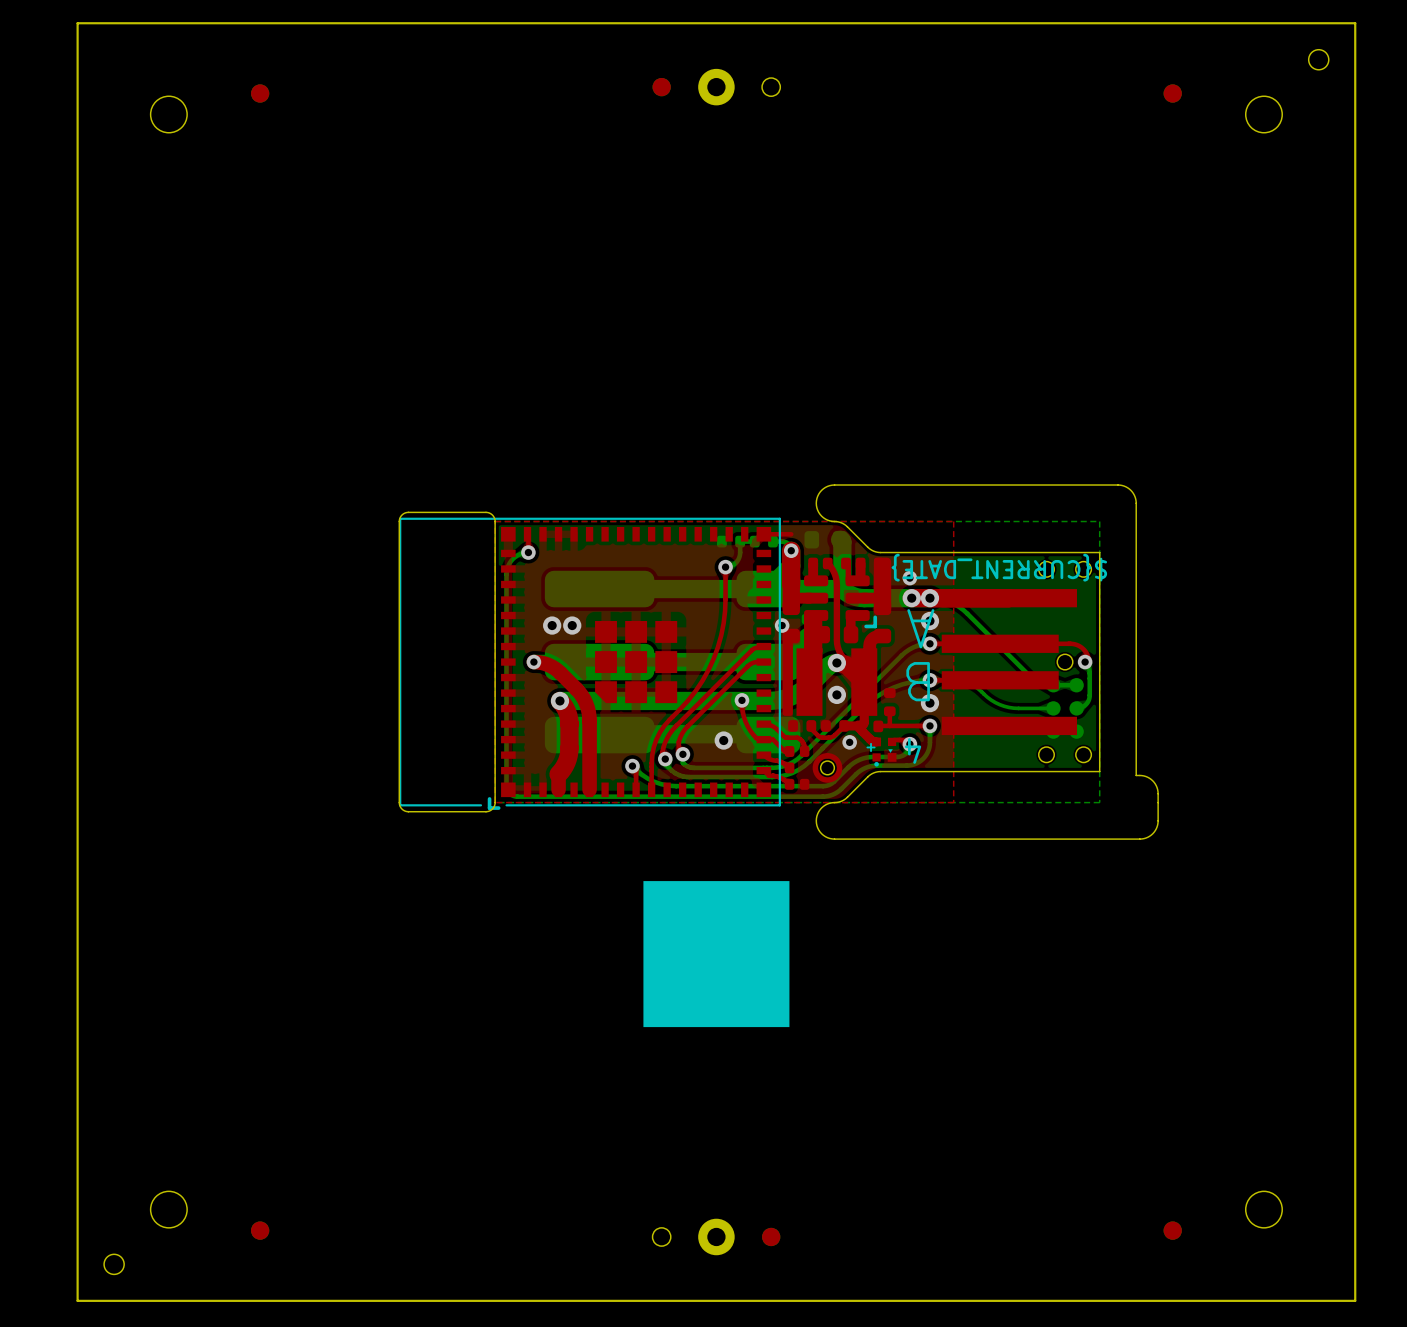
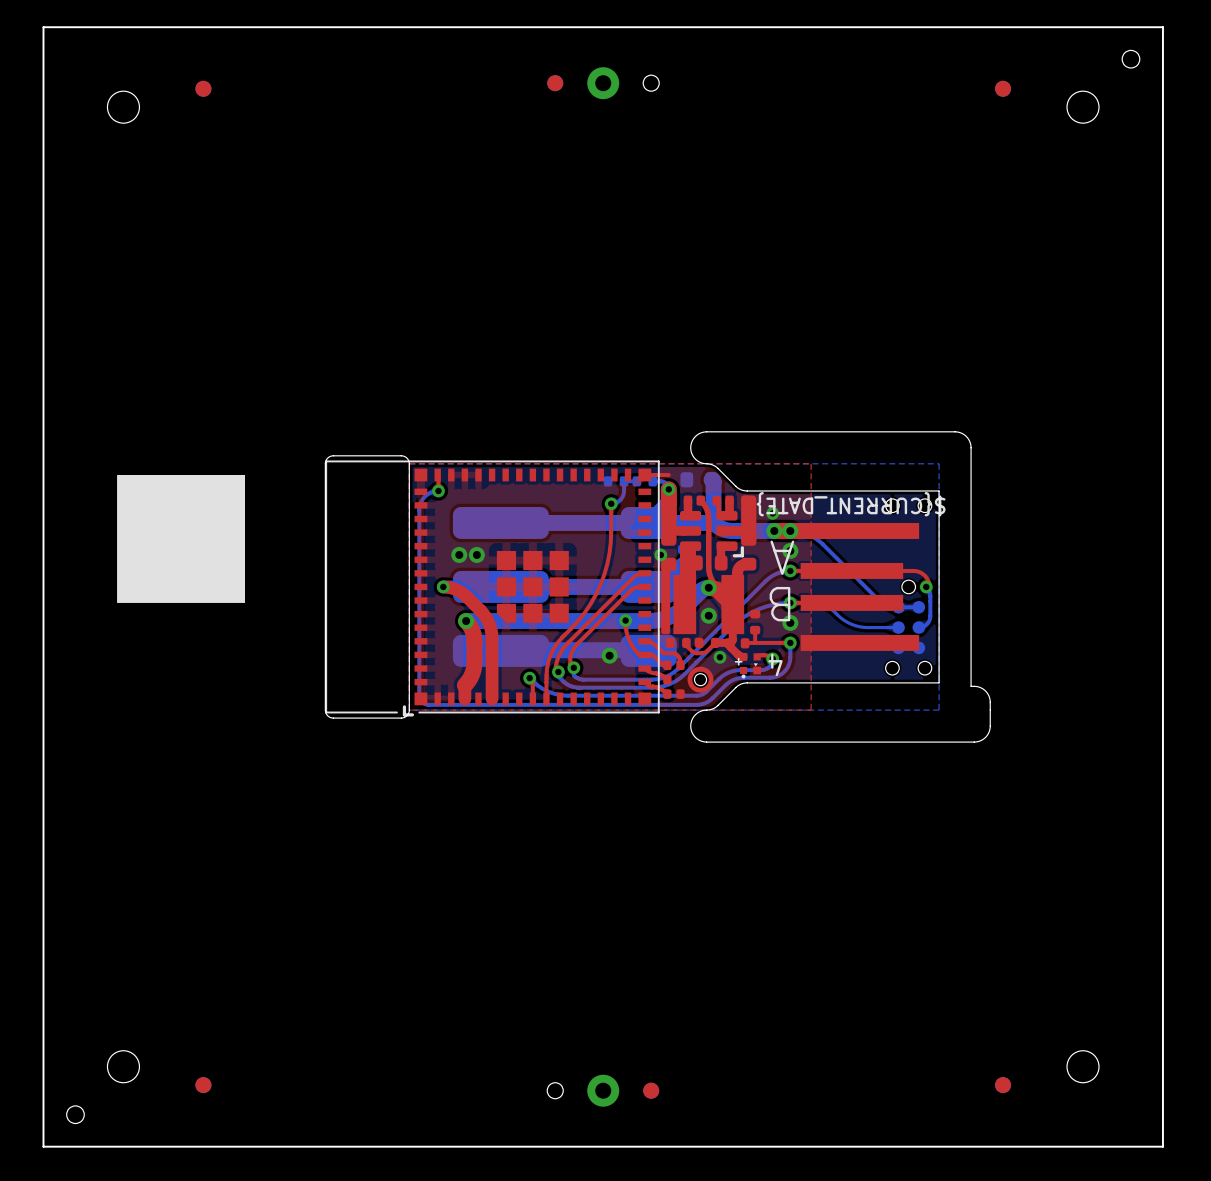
drawing: none -> [117, 475, 246, 603]
drawing: [643, 881, 790, 1028] -> none

